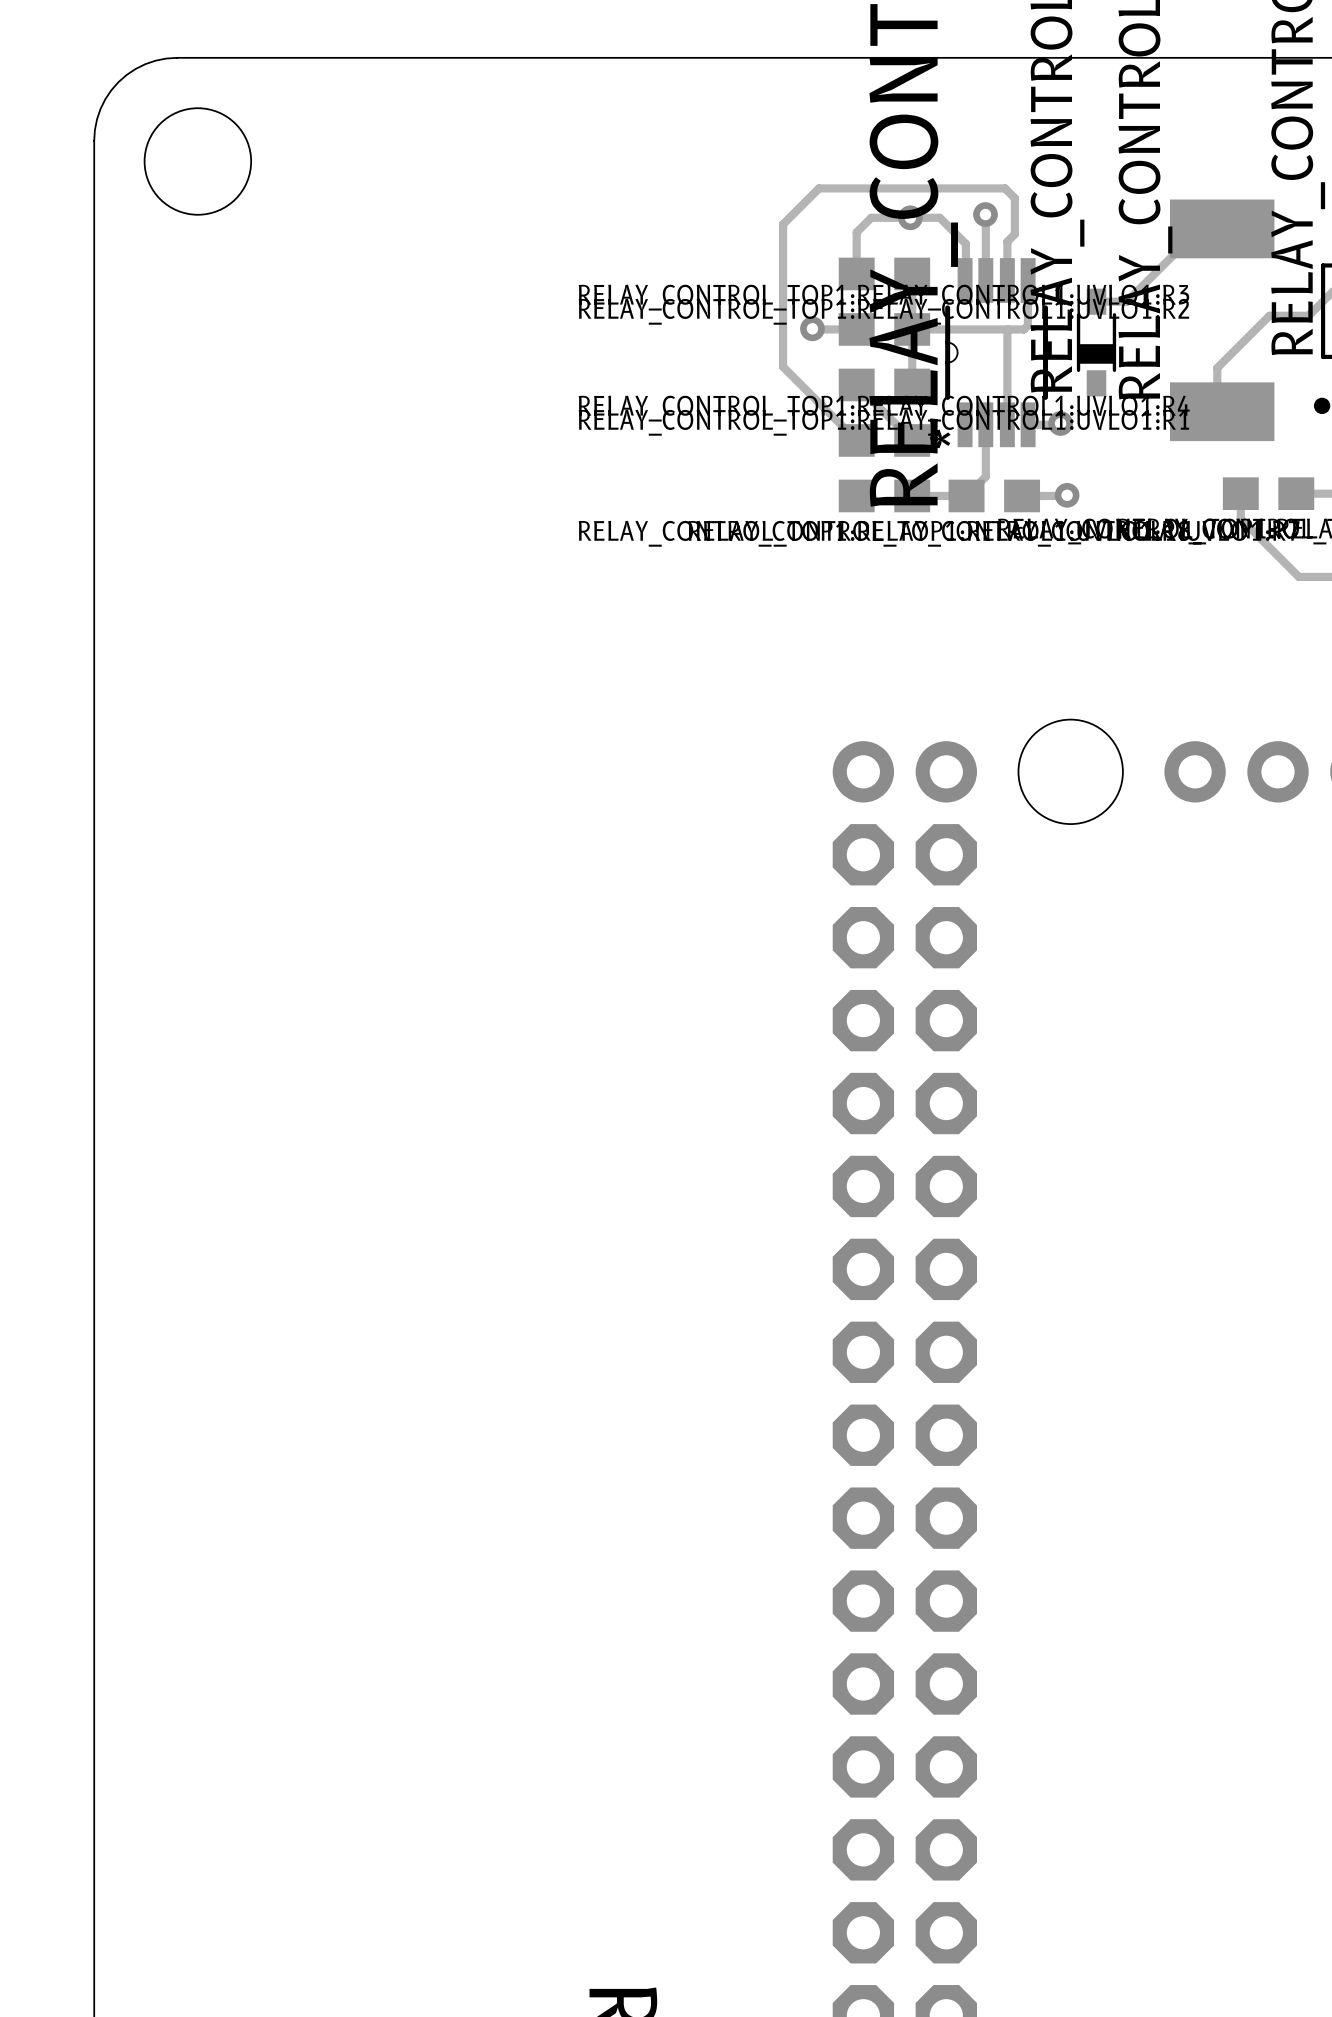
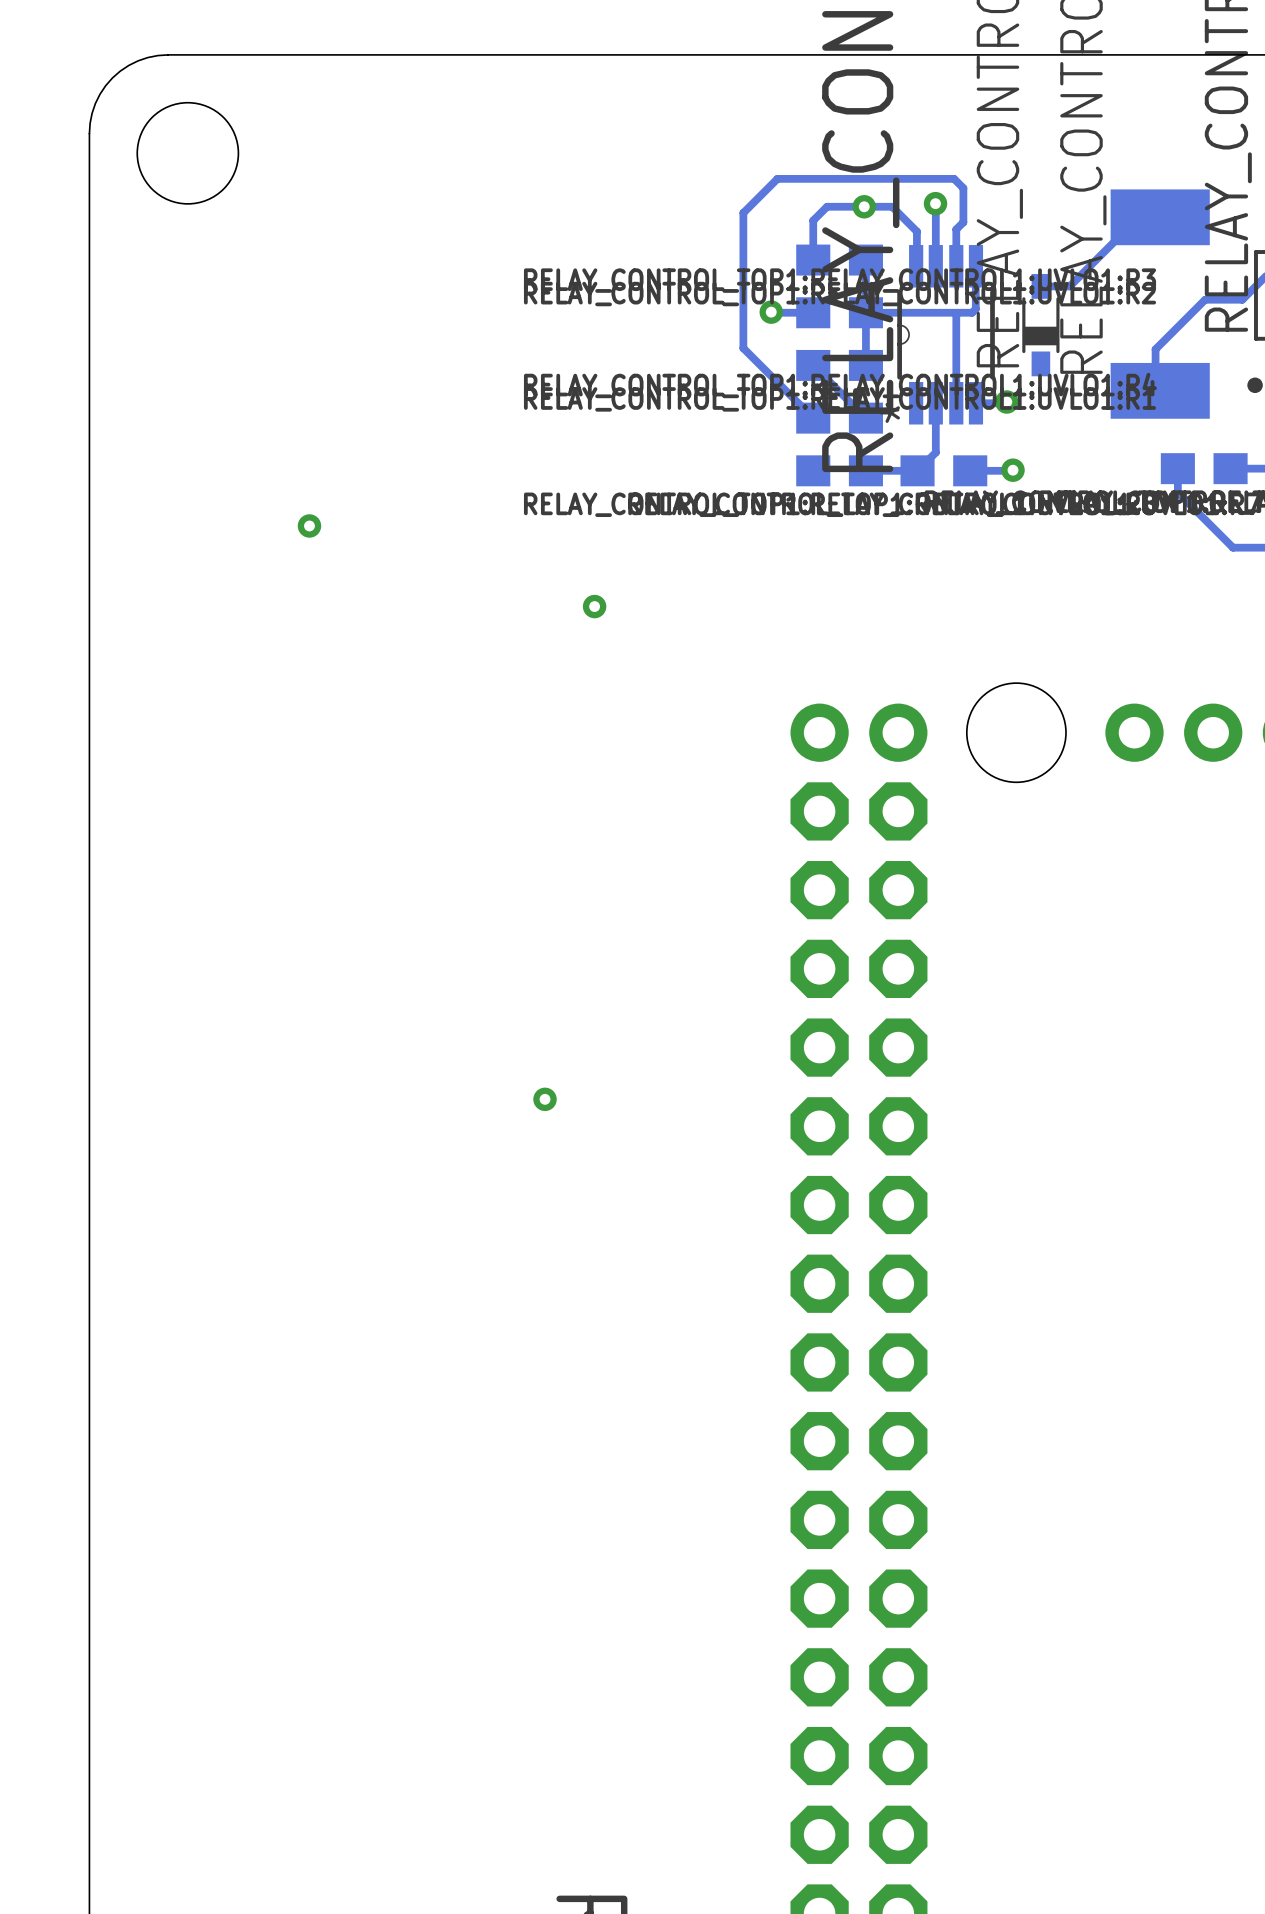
via: none -> (309, 525)
via: none -> (594, 606)
via: none -> (545, 1099)

